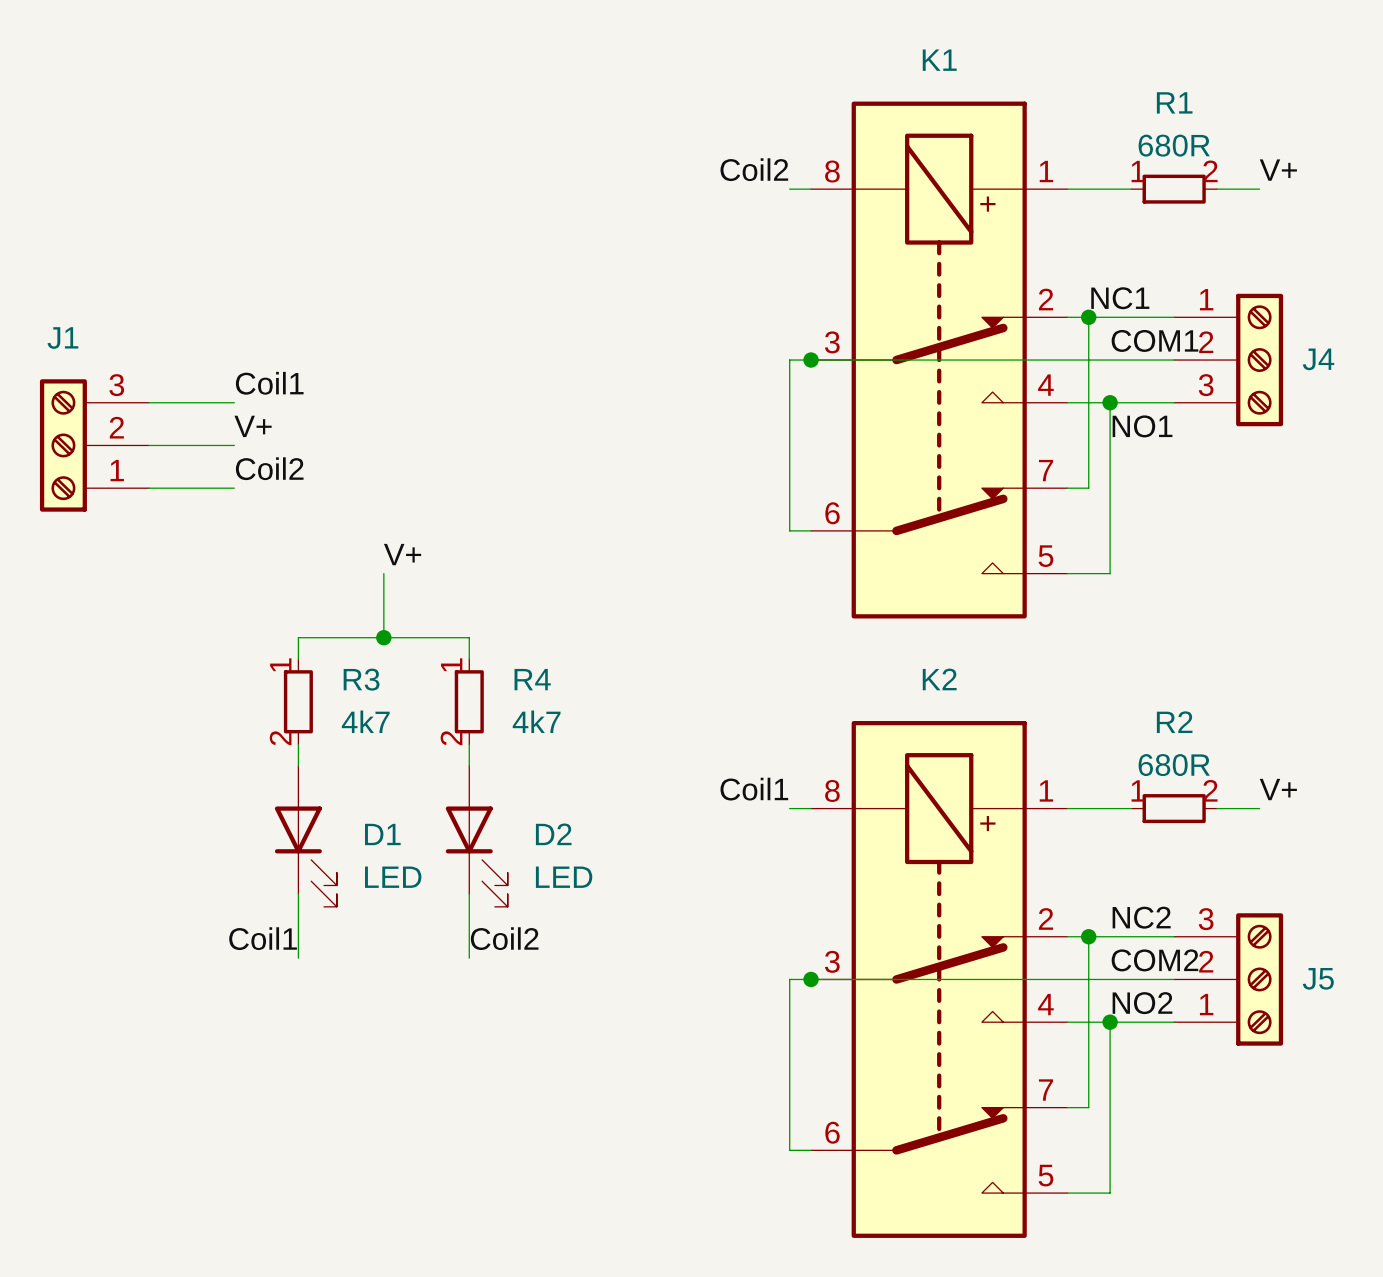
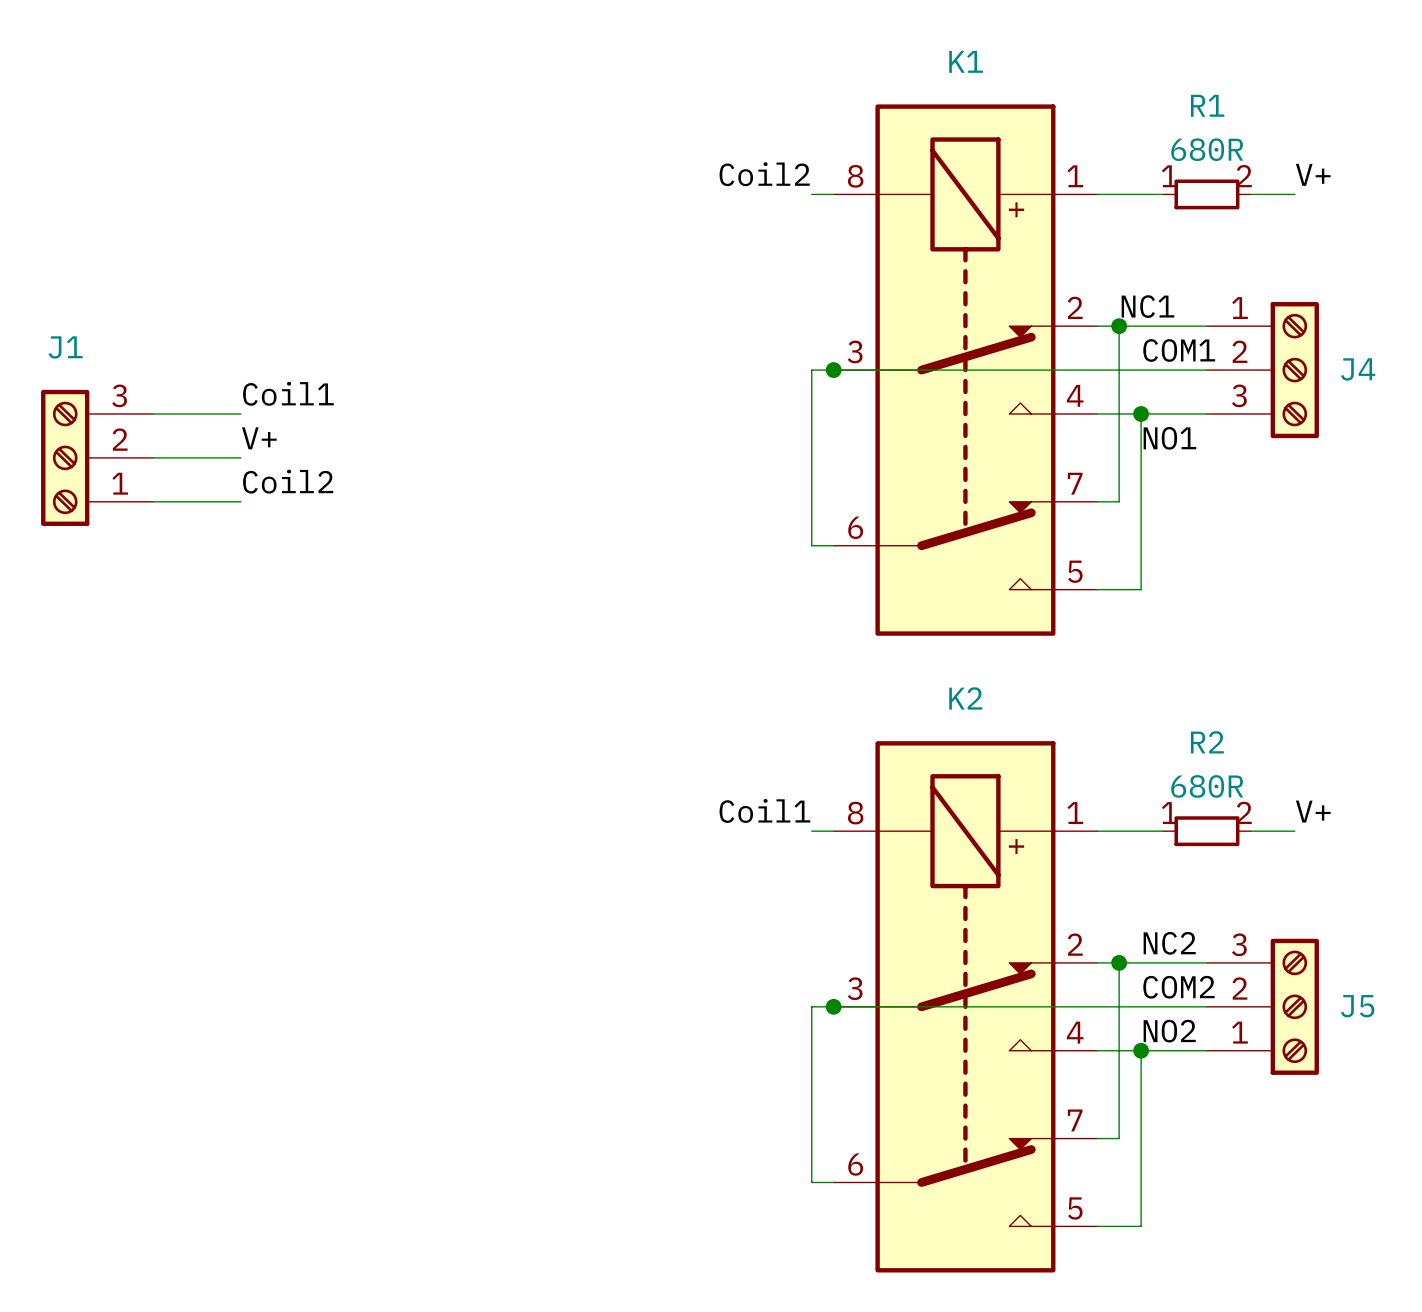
label: V+ (402, 554) -> none
wire: (383, 573) (383, 637) -> none
junction: (383, 637) -> none
wire: (298, 659) (298, 637) (469, 637) (469, 659) -> none
R3: 4k7 (298, 701) -> none
R4: 4k7 (469, 701) -> none
wire: (298, 744) (298, 765) -> none
wire: (469, 744) (469, 765) -> none
D1: LED (305, 836) -> none
D2: LED (476, 836) -> none
wire: (298, 894) (298, 958) -> none
wire: (469, 894) (469, 958) -> none
label: Coil1 (263, 938) -> none
label: Coil2 (504, 938) -> none

